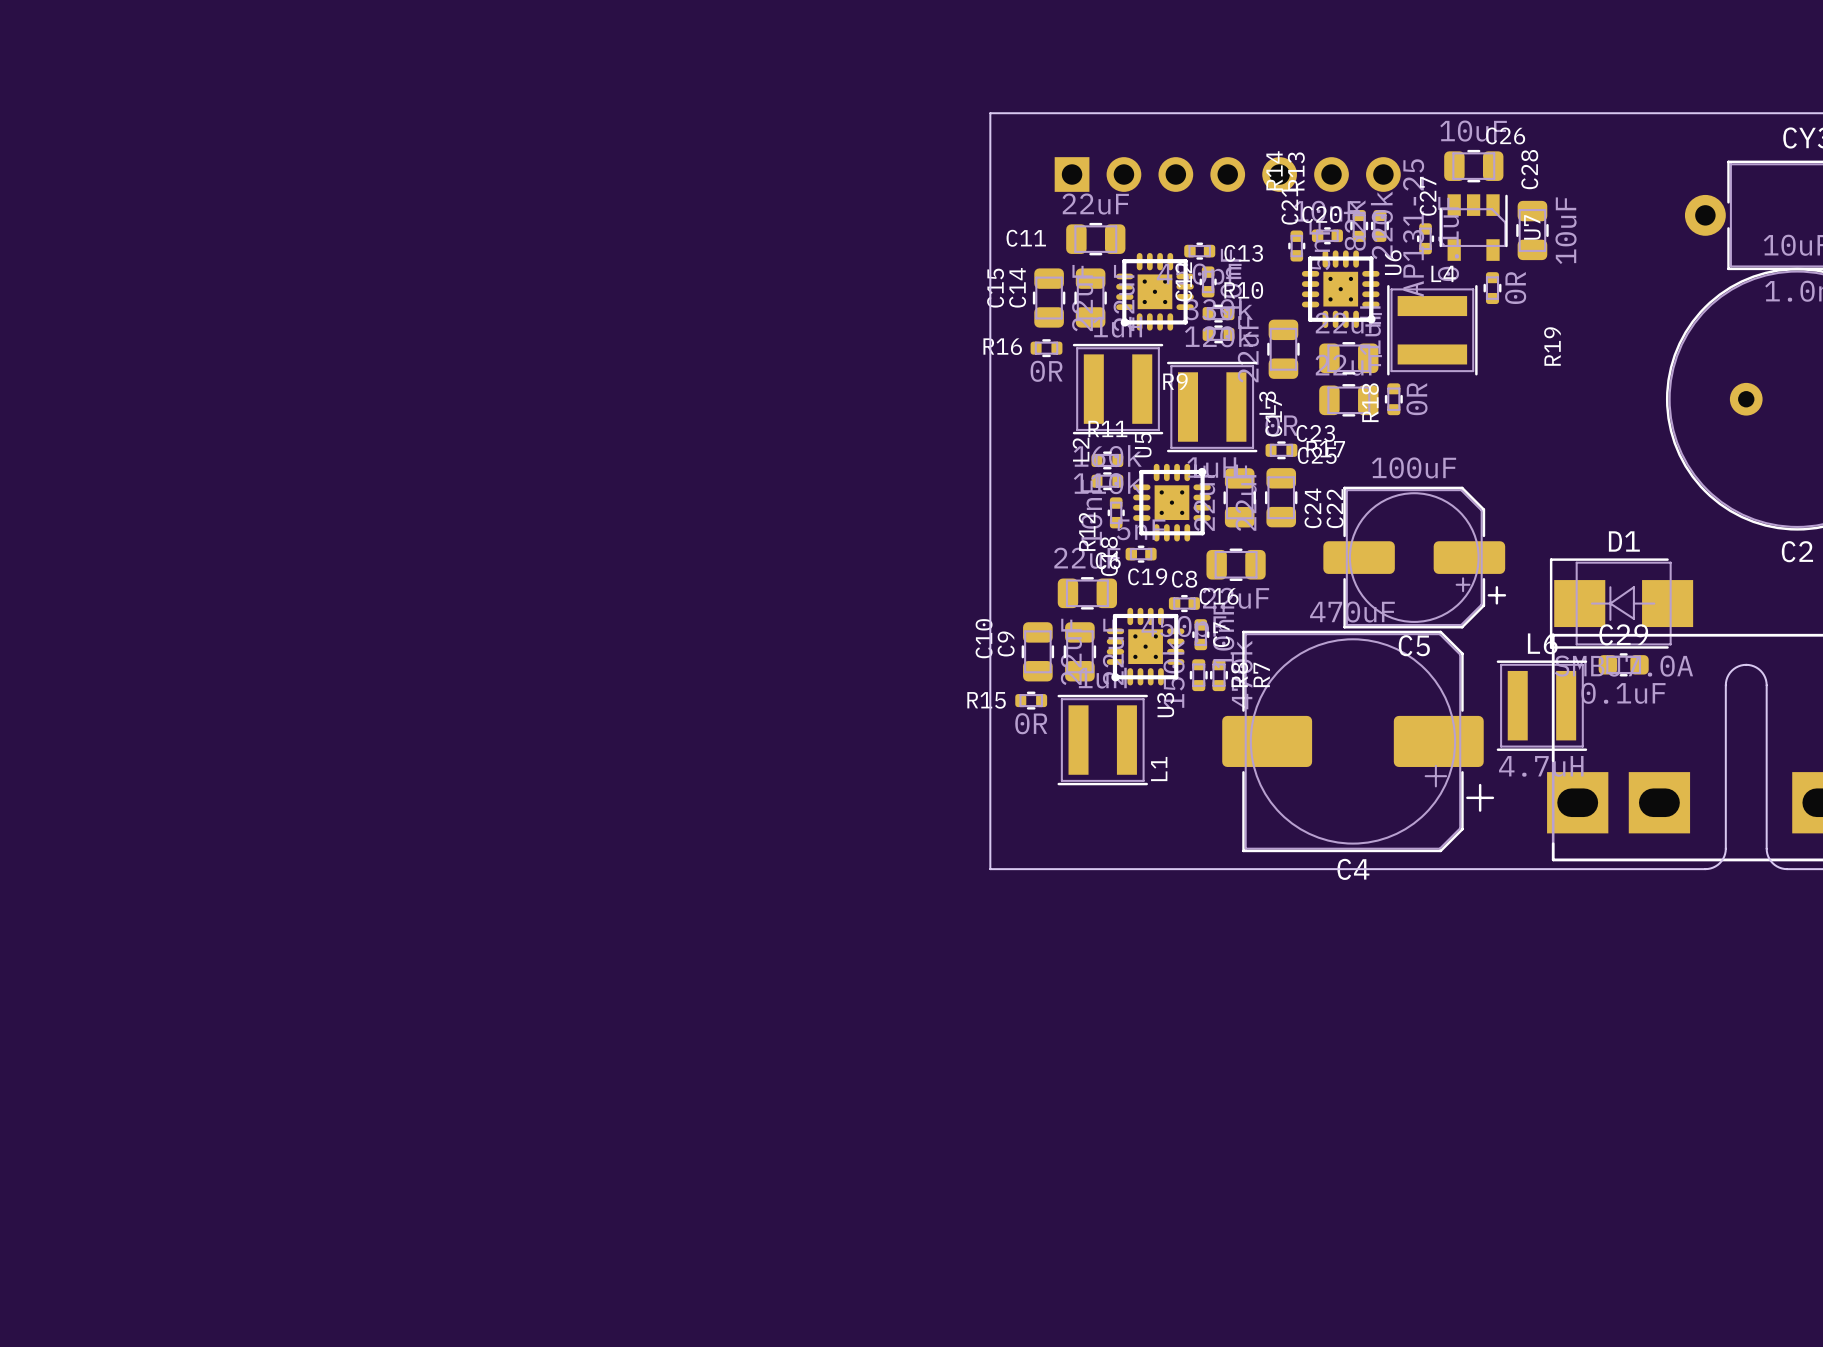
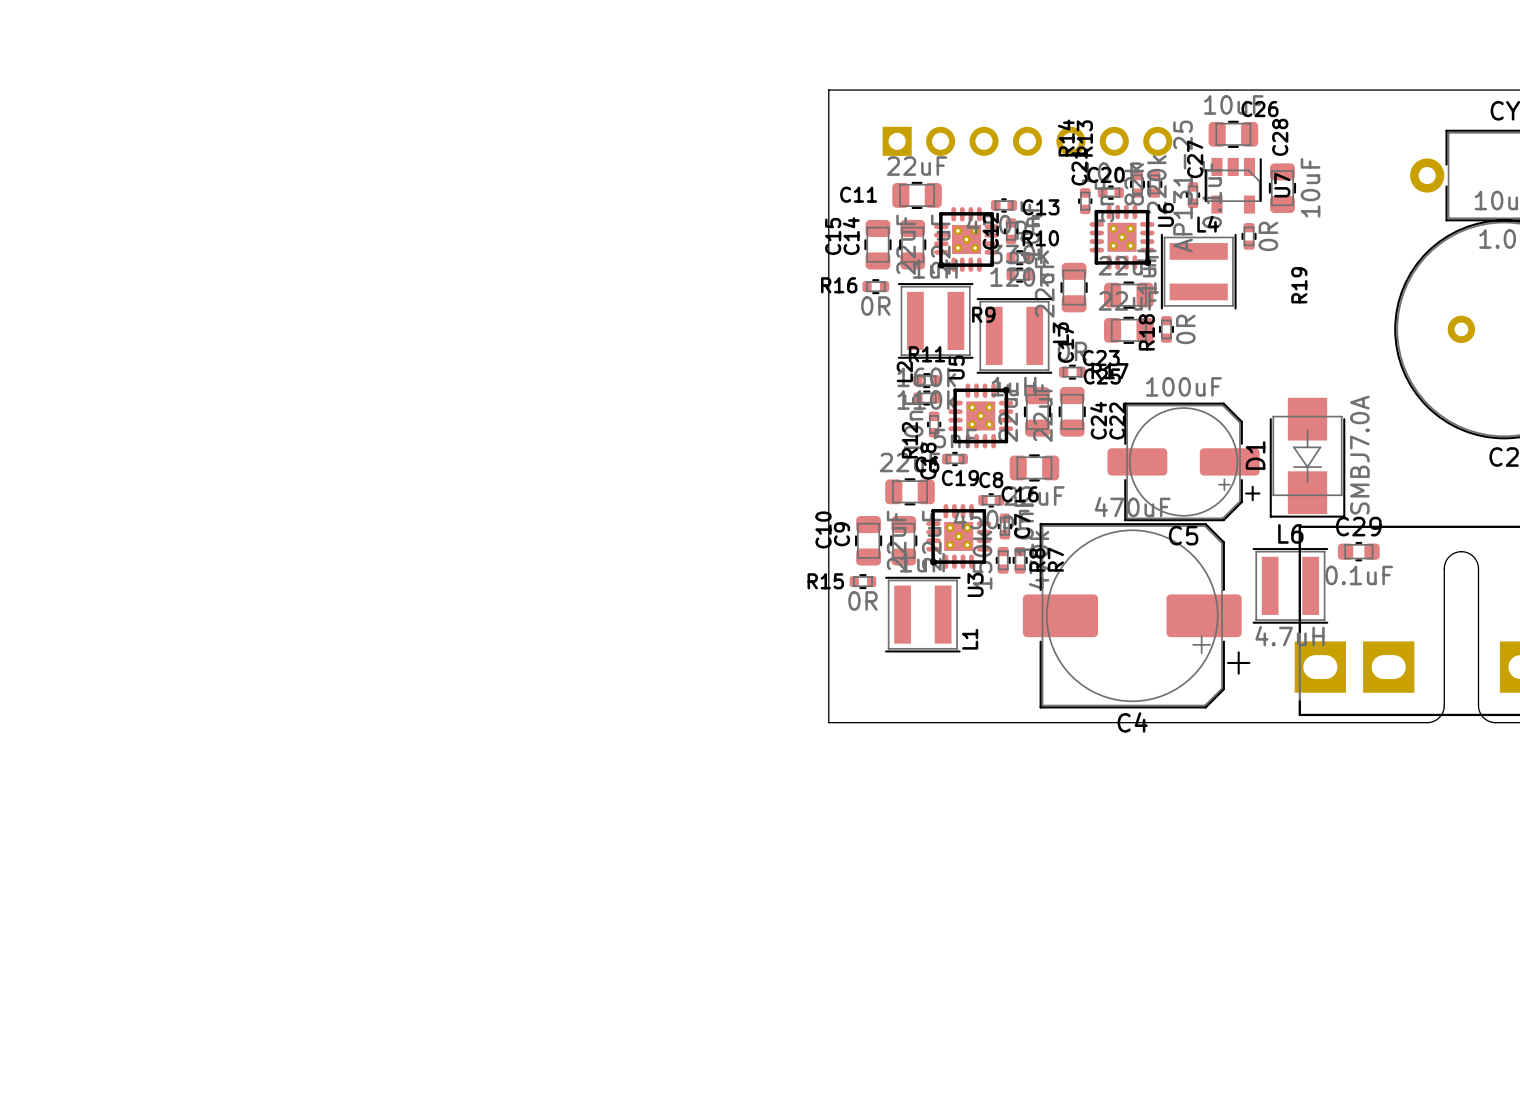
D1 rotation: 0° (1621, 603) -> 90° counterclockwise (1307, 457)

